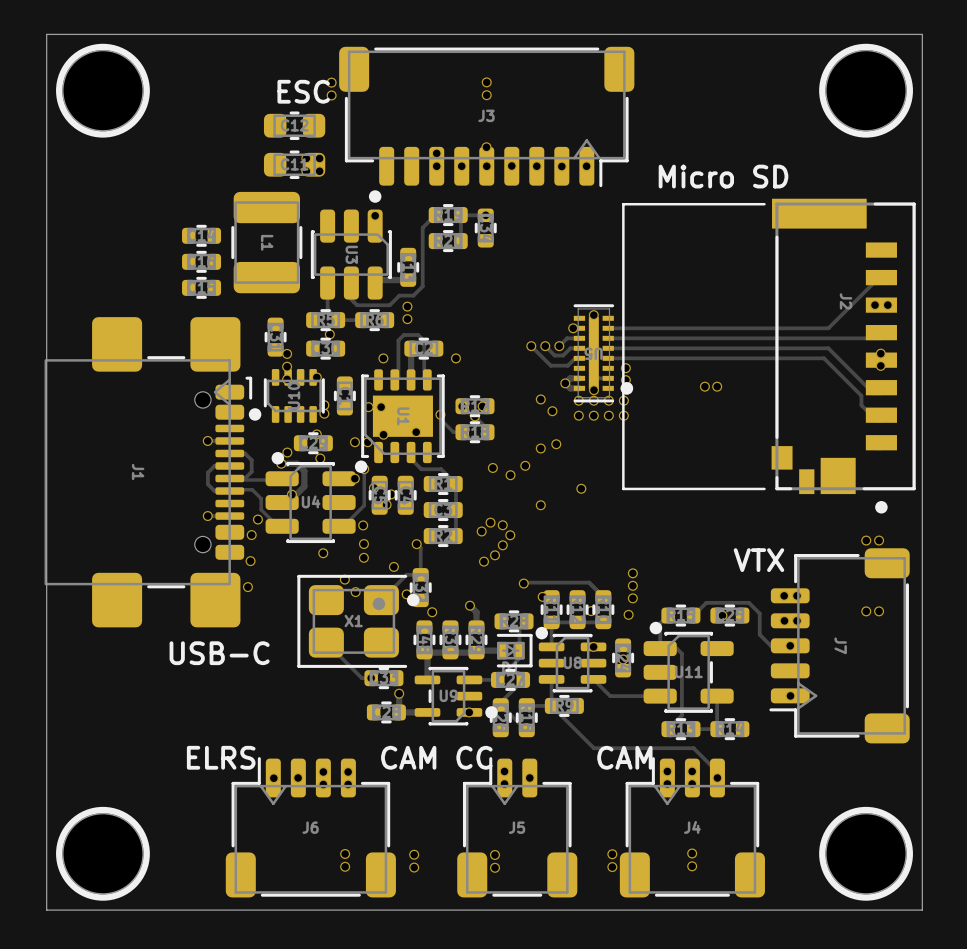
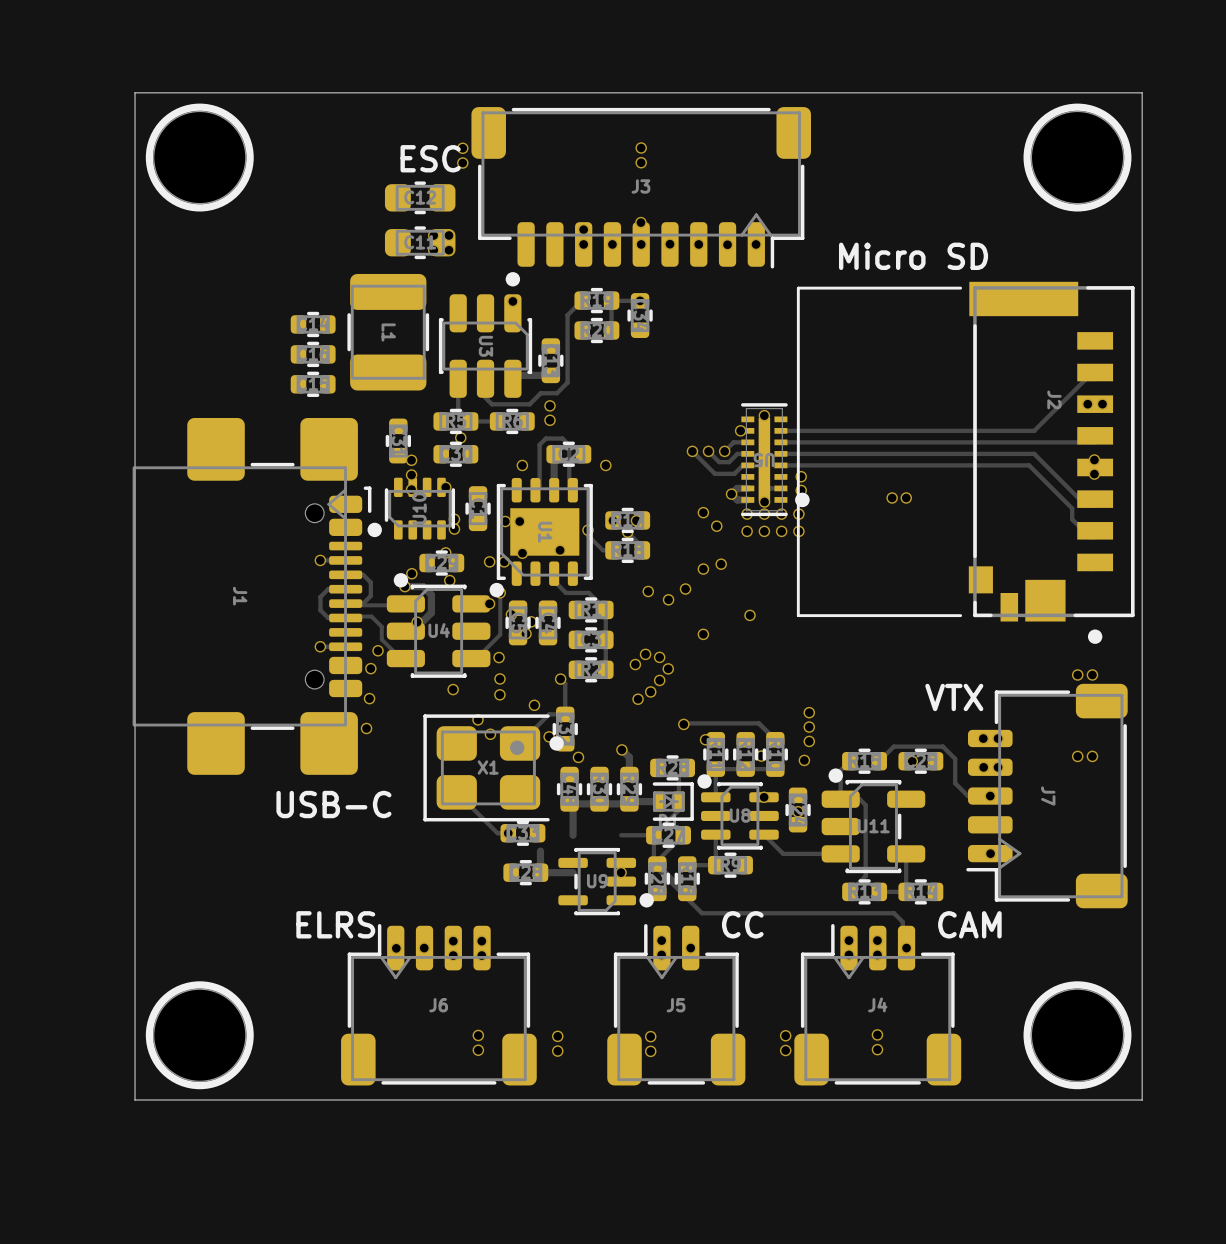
track: none -> (653, 835) (653, 865) (701, 913) (894, 913) (902, 922) (902, 948)
via: (399, 693) -> none
U9 position: (456, 696) -> (606, 881)
track: (551, 705) (593, 748) (693, 748) (717, 771) (717, 777) -> none
text: CAM CC (436, 757) -> none
text: none -> CC (742, 924)
text position: CAM (624, 757) -> CAM (969, 924)

